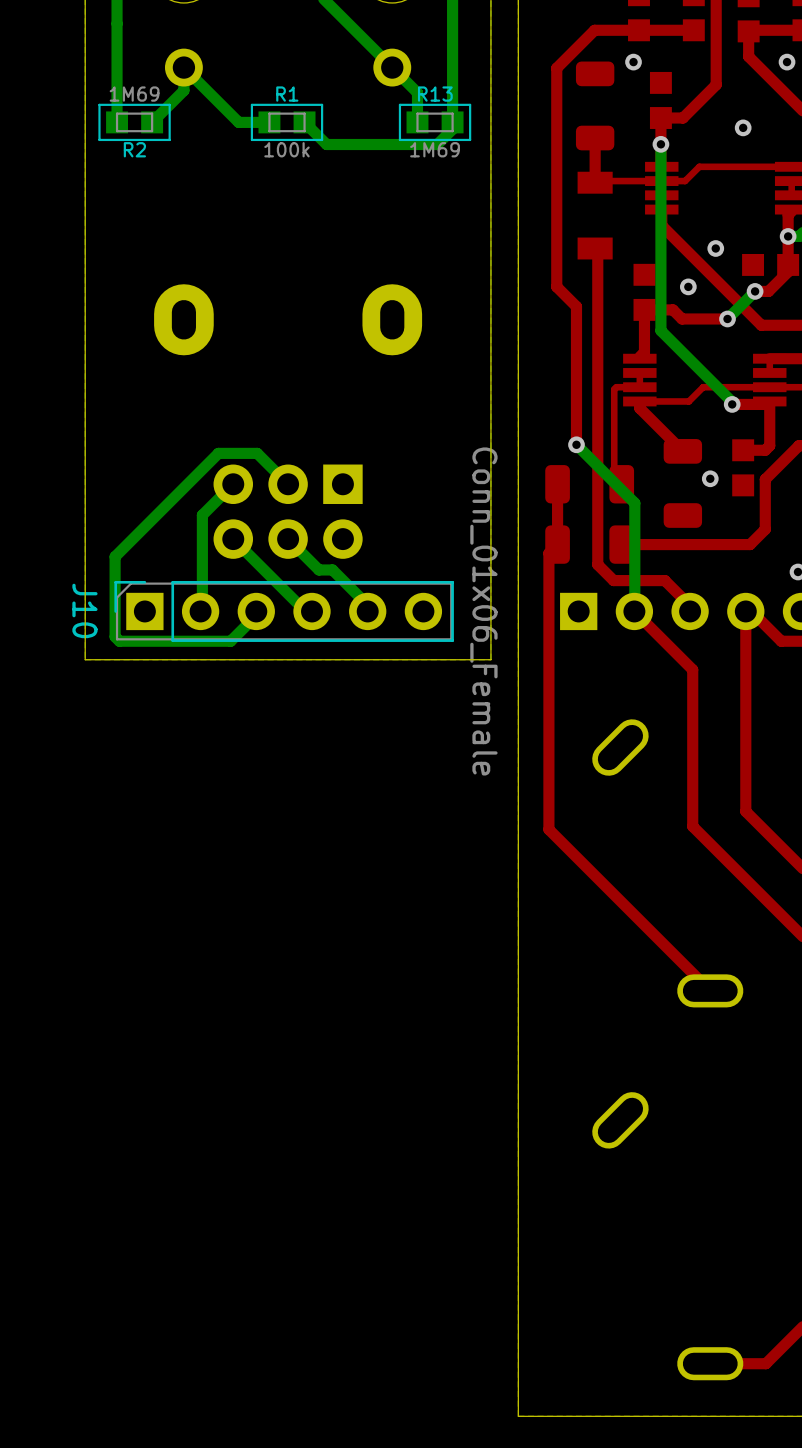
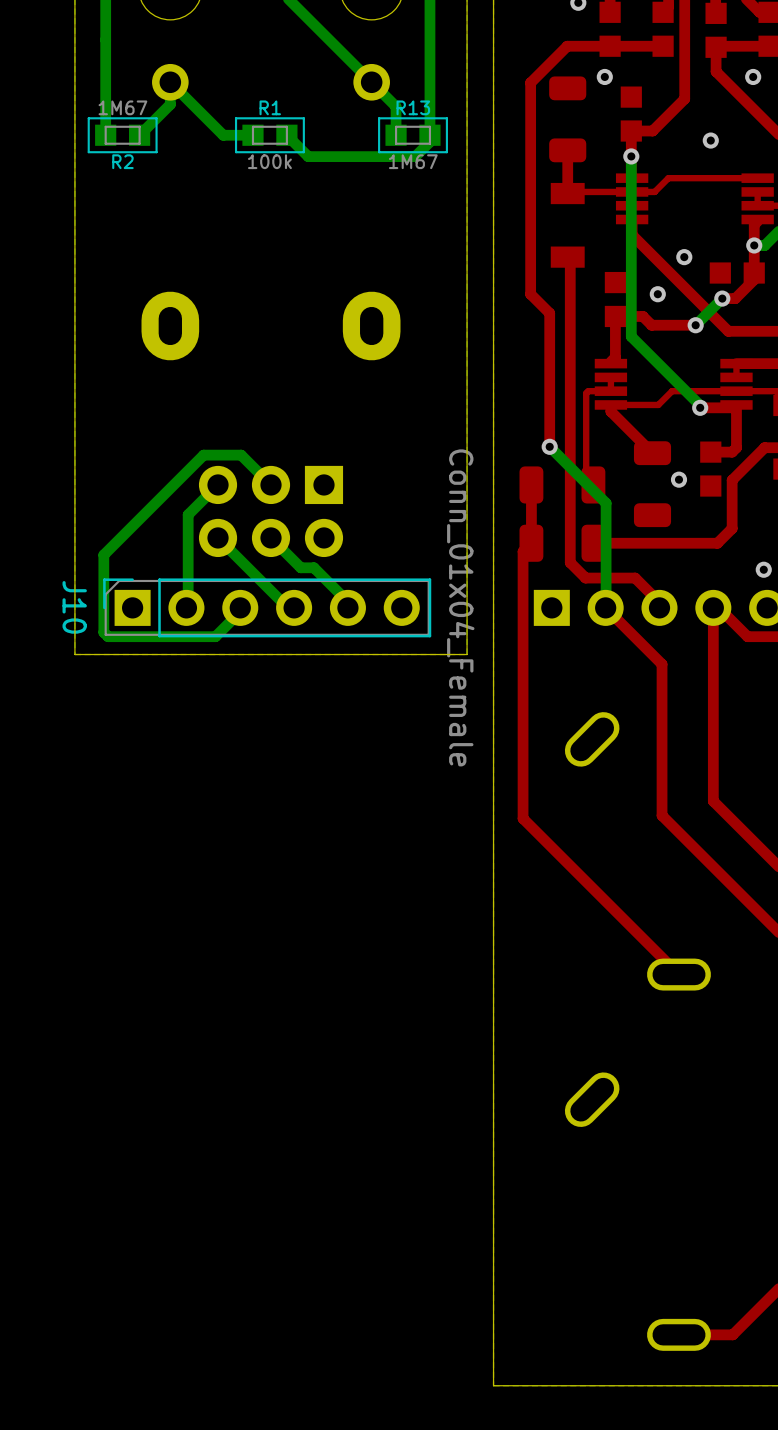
R2 value: 1M69 (134, 94) -> 1M67 (122, 107)
R13 value: 1M69 (435, 149) -> 1M67 (413, 161)
J10 value: Conn_01x06_Female (483, 611) -> Conn_01x04_Female (460, 607)

